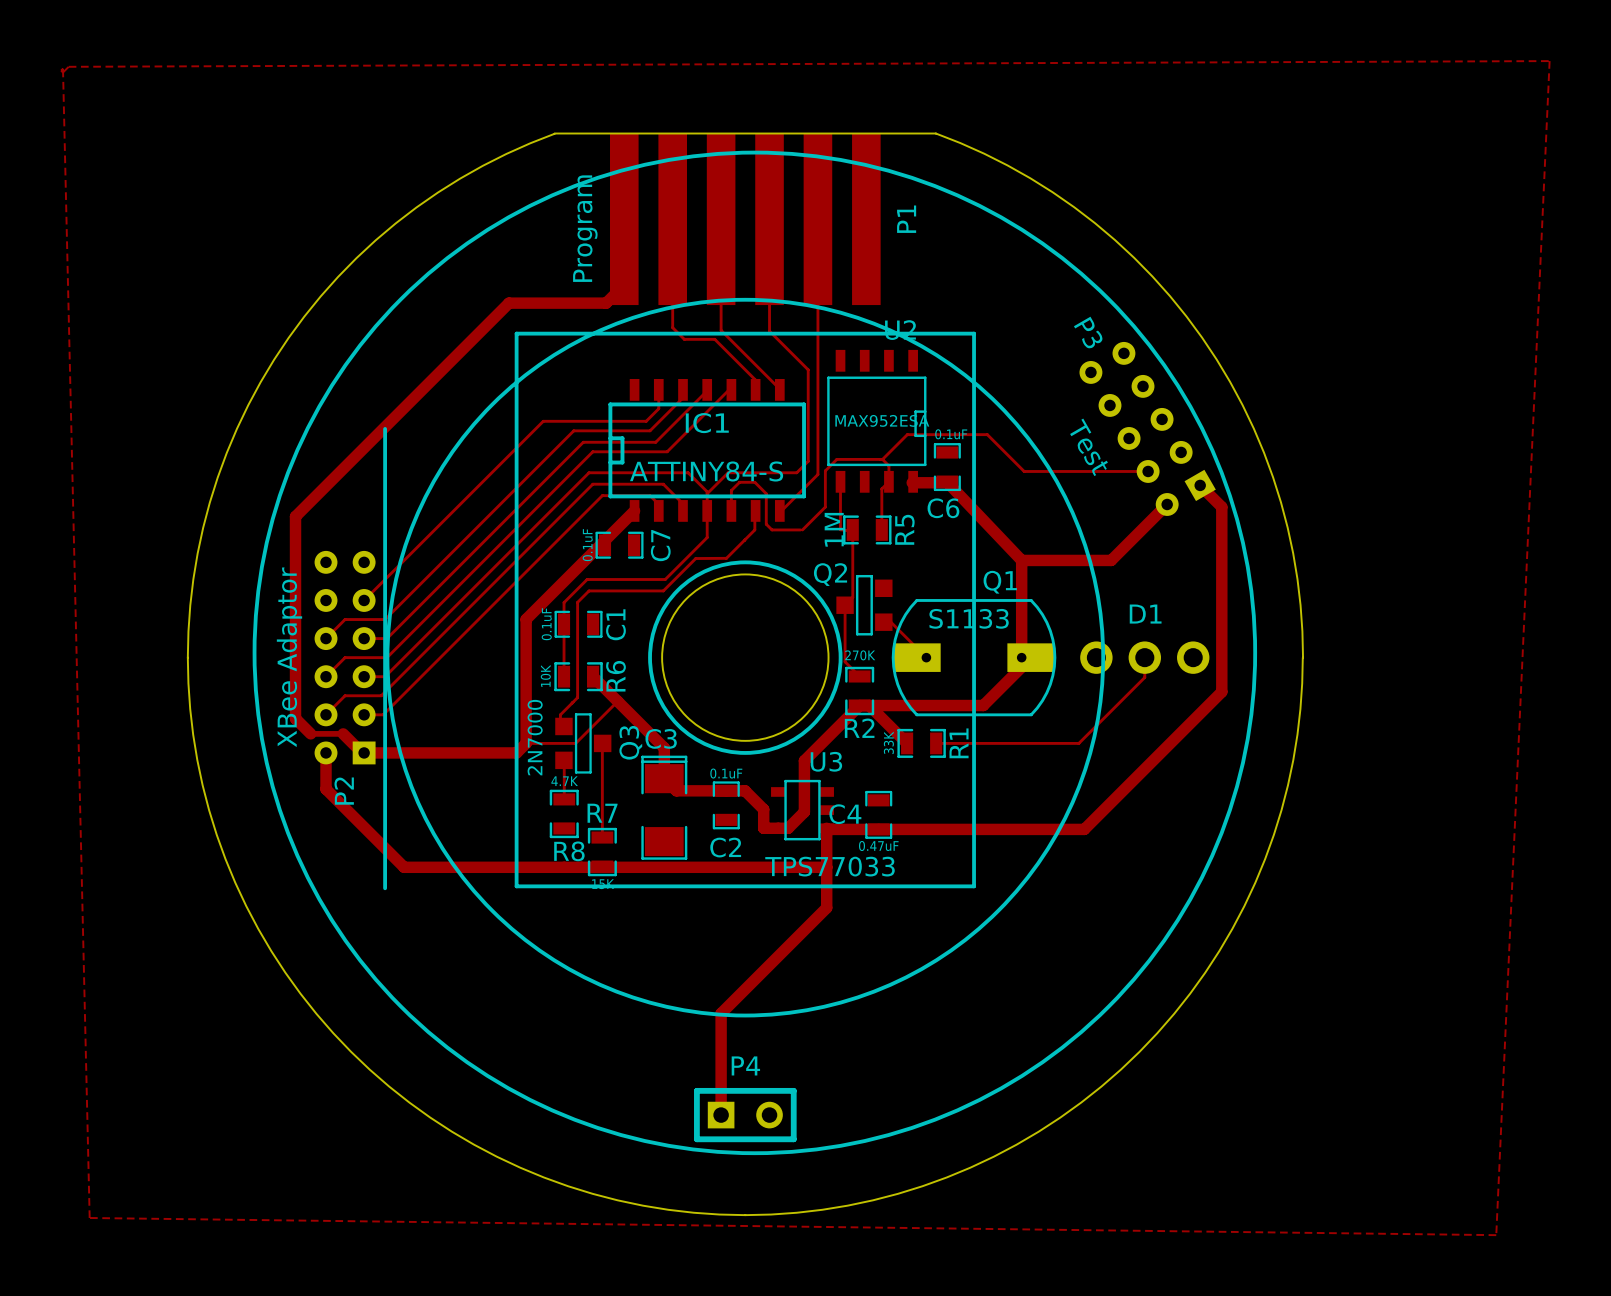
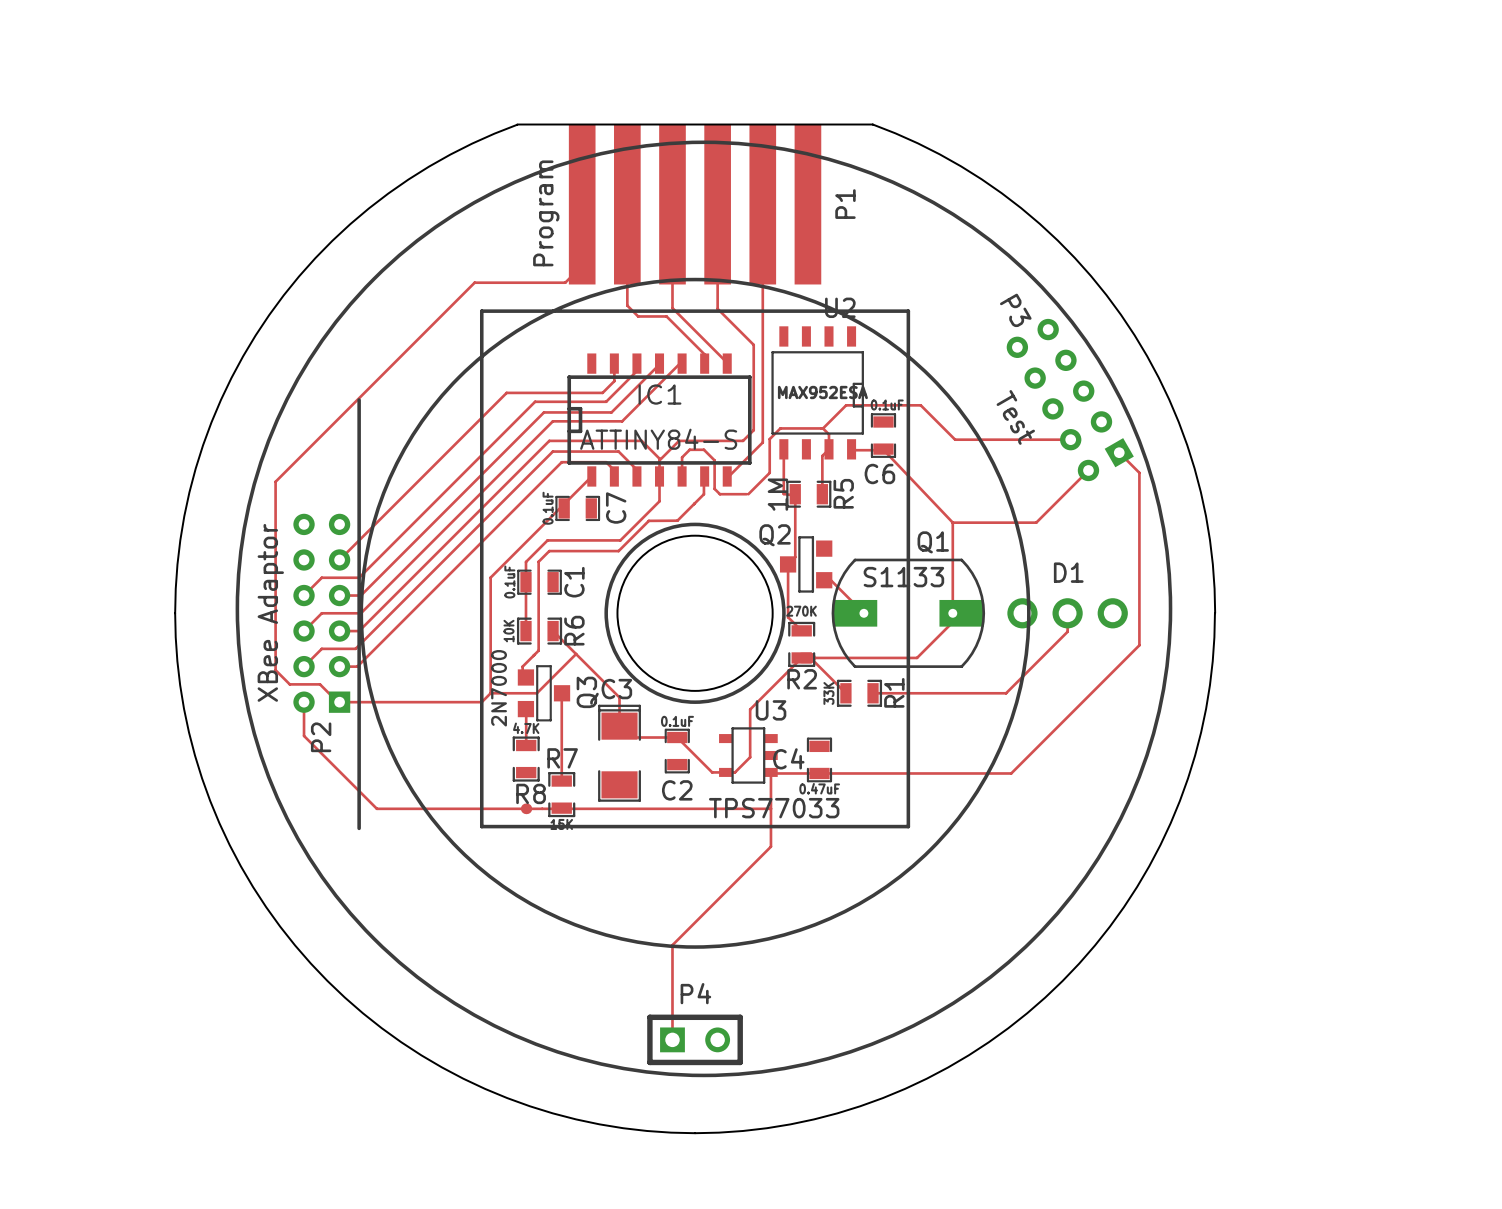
zone outline: (1549, 61) (1496, 1235) (89, 1217) (62, 68) (61, 70) (62, 72) (68, 66) (1549, 61) -> none
track width: thick (624, 285) (606, 303) (508, 303) (295, 516) (295, 718) (310, 733) (343, 733) (362, 752) -> thin (582, 265) (565, 282) (474, 282) (275, 481) (275, 670) (289, 684) (320, 684) (337, 702)
track width: thick (912, 482) (947, 482) (1021, 560) -> thin (850, 450) (883, 450) (952, 522)
track width: thick (1200, 485) (1221, 507) (1221, 691) (1084, 829) (827, 829) -> thin (1119, 452) (1139, 472) (1139, 645) (1011, 773) (772, 773)
track width: thick (1167, 504) (1111, 560) (1021, 560) -> thin (1088, 470) (1036, 522) (952, 522)
track width: thick (634, 510) (526, 619) (526, 743) (516, 752) (364, 752) -> thin (591, 476) (490, 577) (490, 693) (481, 702) (339, 702)
track width: thick (1021, 560) (1021, 667) (983, 705) (869, 705) (907, 743) -> thin (952, 522) (952, 622) (917, 657) (810, 657) (845, 693)
track width: thick (593, 676) (664, 747) (664, 778) (676, 790) (726, 790) -> thin (553, 631) (619, 697) (619, 726) (630, 737) (677, 737)
track width: thick (859, 705) (804, 760) (804, 812) (788, 828) (763, 828) -> thin (801, 657) (750, 709) (750, 757) (735, 772) (712, 772)
track width: thick (326, 752) (326, 789) (404, 867) (564, 867) -> thin (304, 702) (304, 735) (376, 808) (526, 808)
track: (726, 790) (745, 790) (763, 809) (763, 828) -> (677, 737) (712, 772)
track width: thick (826, 828) (826, 907) (721, 1013) (721, 1115) -> thin (770, 772) (770, 846) (672, 945) (672, 1039)
track width: thick (564, 867) (826, 867) -> thin (526, 808) (770, 808)

